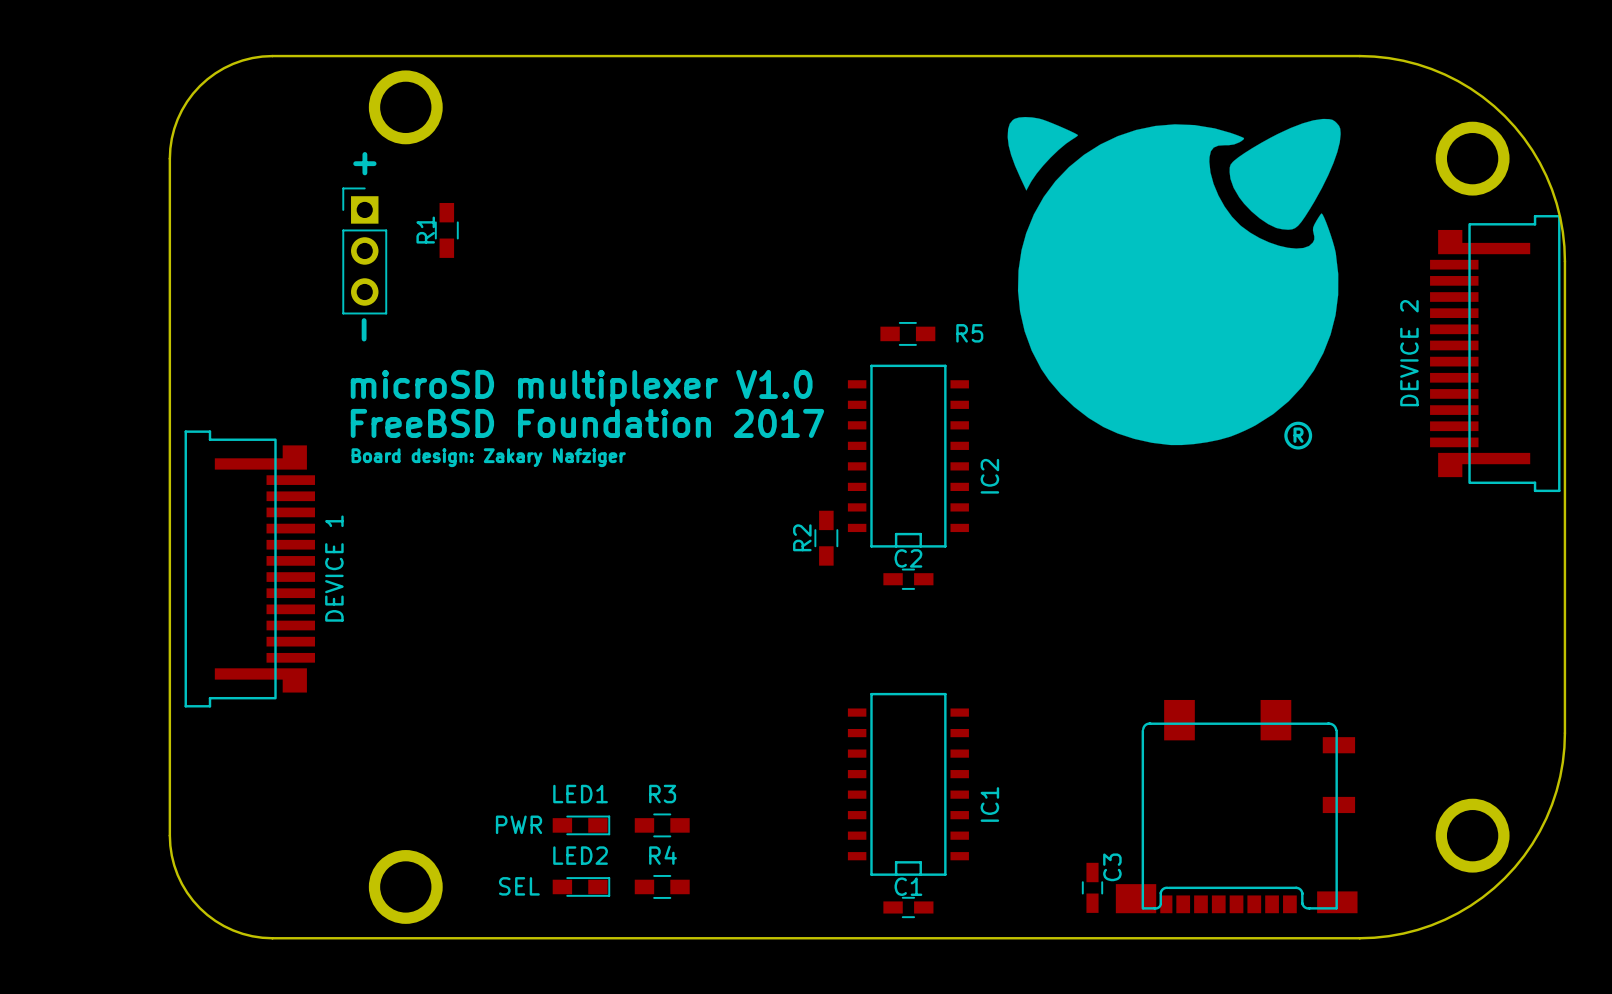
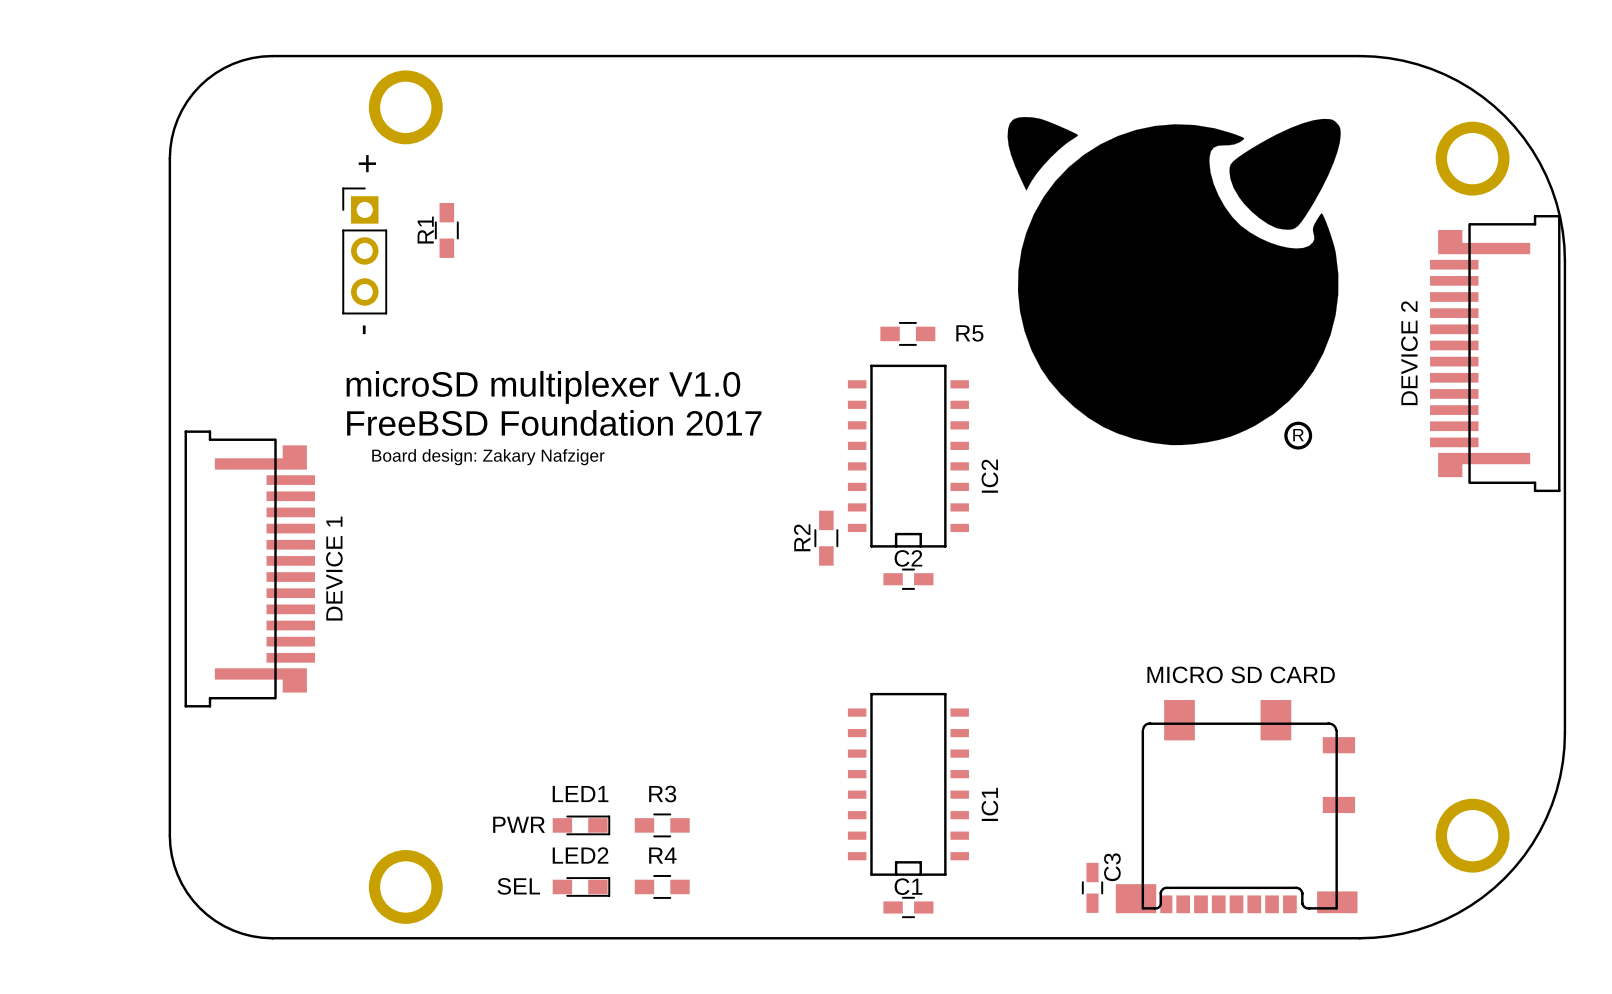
part value: none -> MICRO SD CARD (1241, 674)

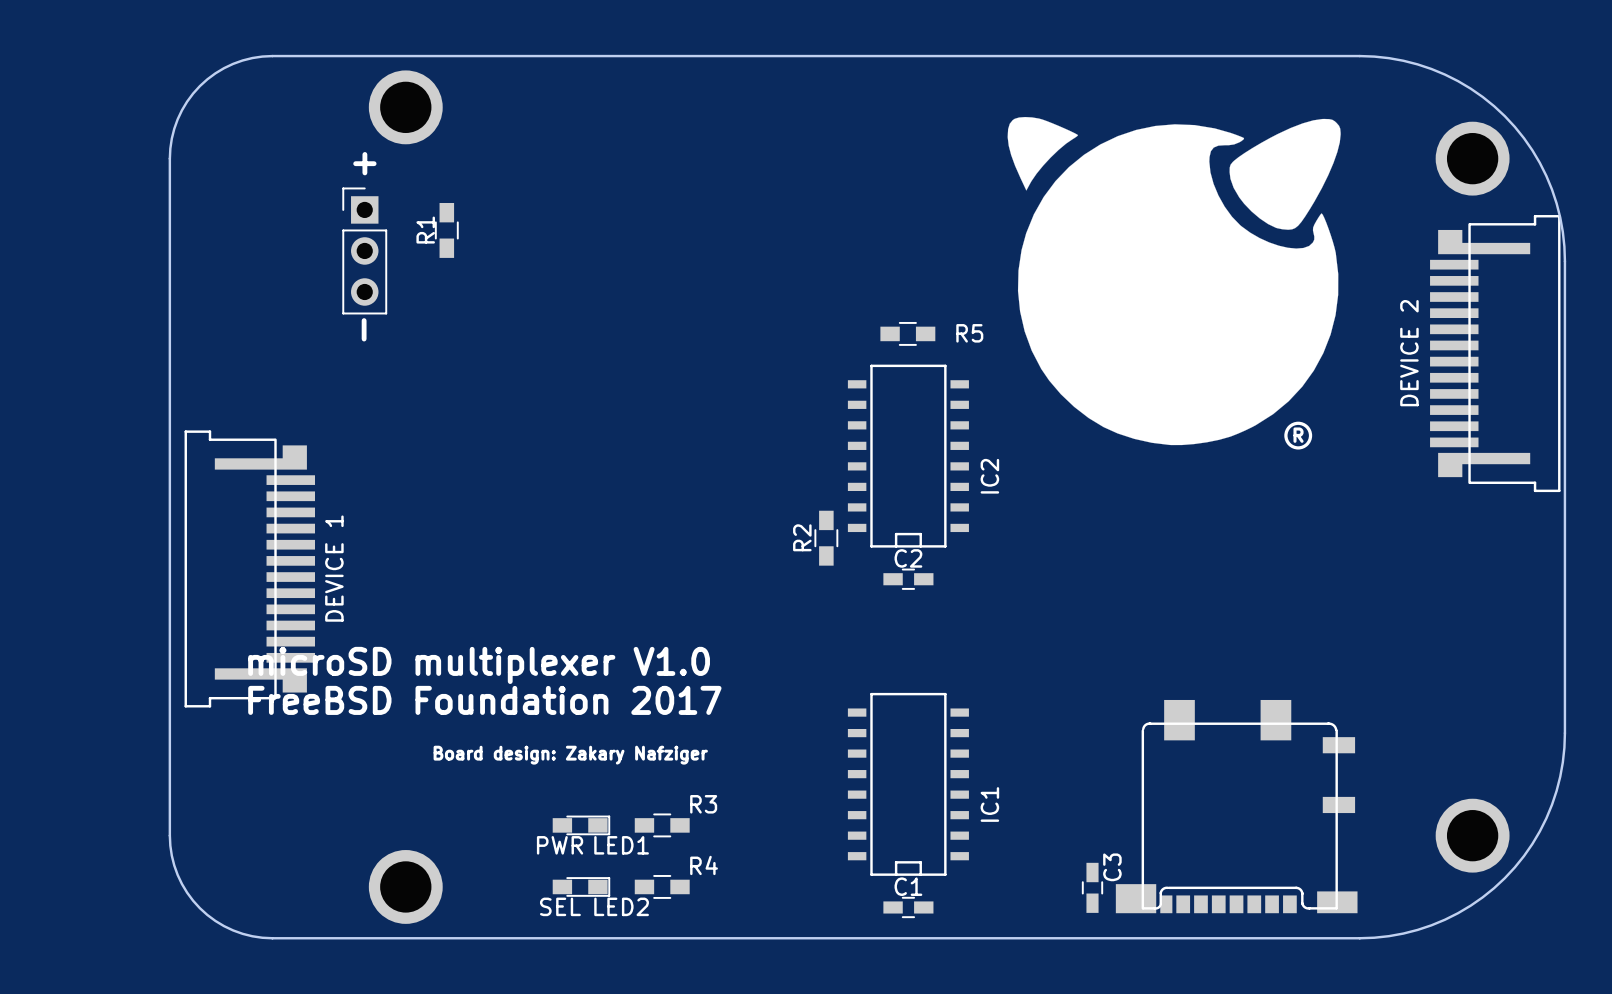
text position: microSD multiplexer V1.0 (543, 387) -> microSD multiplexer V1.0 (479, 665)
text position: FreeBSD Foundation 2017 (554, 422) -> FreeBSD Foundation 2017 (484, 700)
text position: Board design: Zakary Nafziger (488, 457) -> Board design: Zakary Nafziger (570, 755)
part value: MICRO SD CARD (1241, 674) -> none
LED1 name position: LED1 (580, 794) -> LED1 (621, 845)
R3 name position: R3 (662, 794) -> R3 (703, 804)
LED1 value position: PWR (519, 824) -> PWR (560, 845)
LED2 name position: LED2 (580, 855) -> LED2 (621, 906)
R4 name position: R4 (662, 855) -> R4 (704, 865)
LED2 value position: SEL (518, 886) -> SEL (560, 906)

